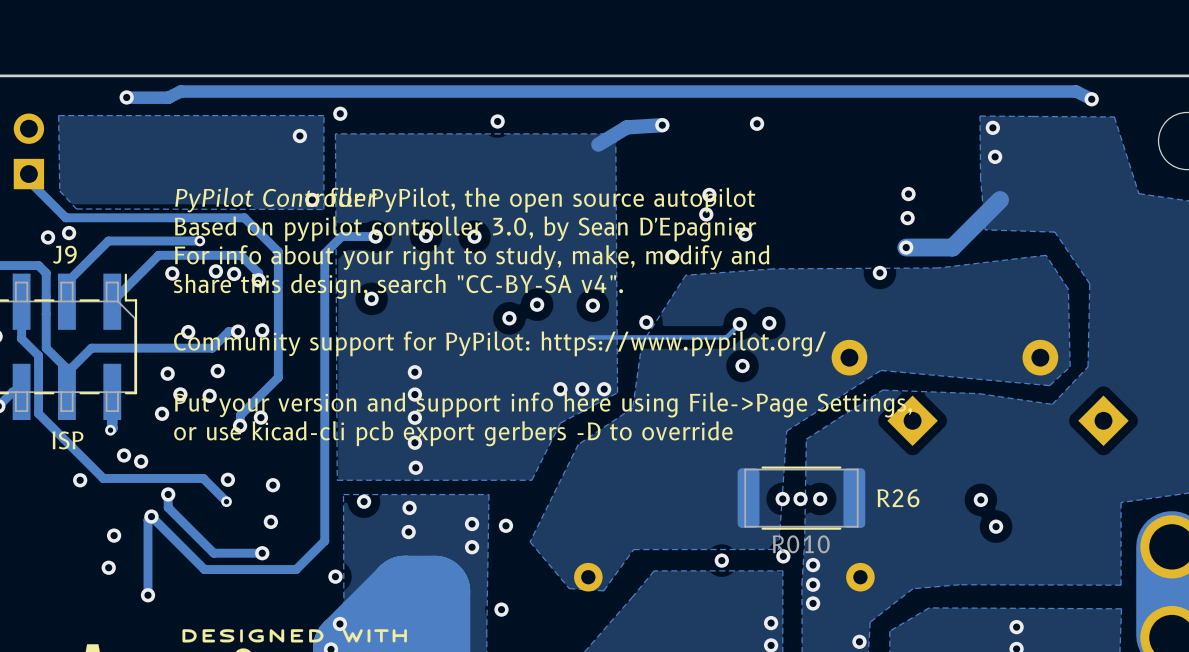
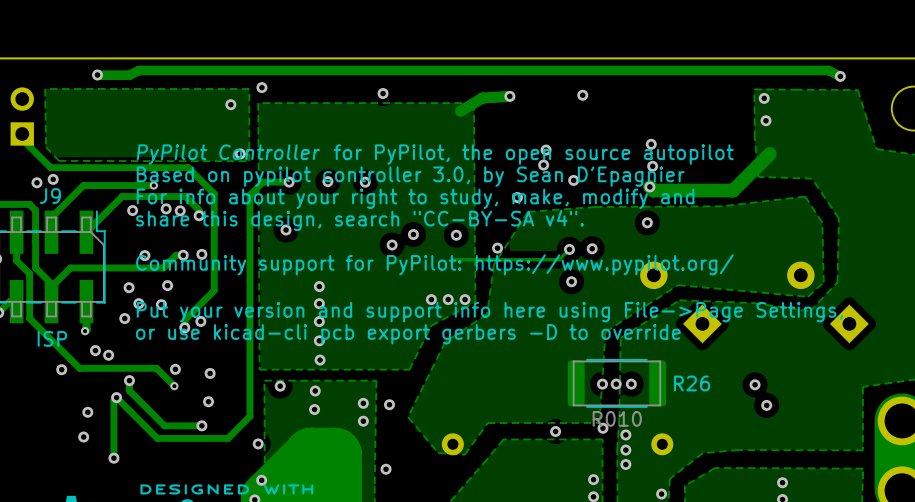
via: none -> (651, 144)
via: (908, 194) -> none
via: none -> (652, 166)
via: (907, 218) -> none
track: none -> (649, 186) (653, 190) (697, 190)
via: none -> (649, 186)
via: (906, 247) -> none
via: (879, 272) -> none
via: none -> (647, 222)

